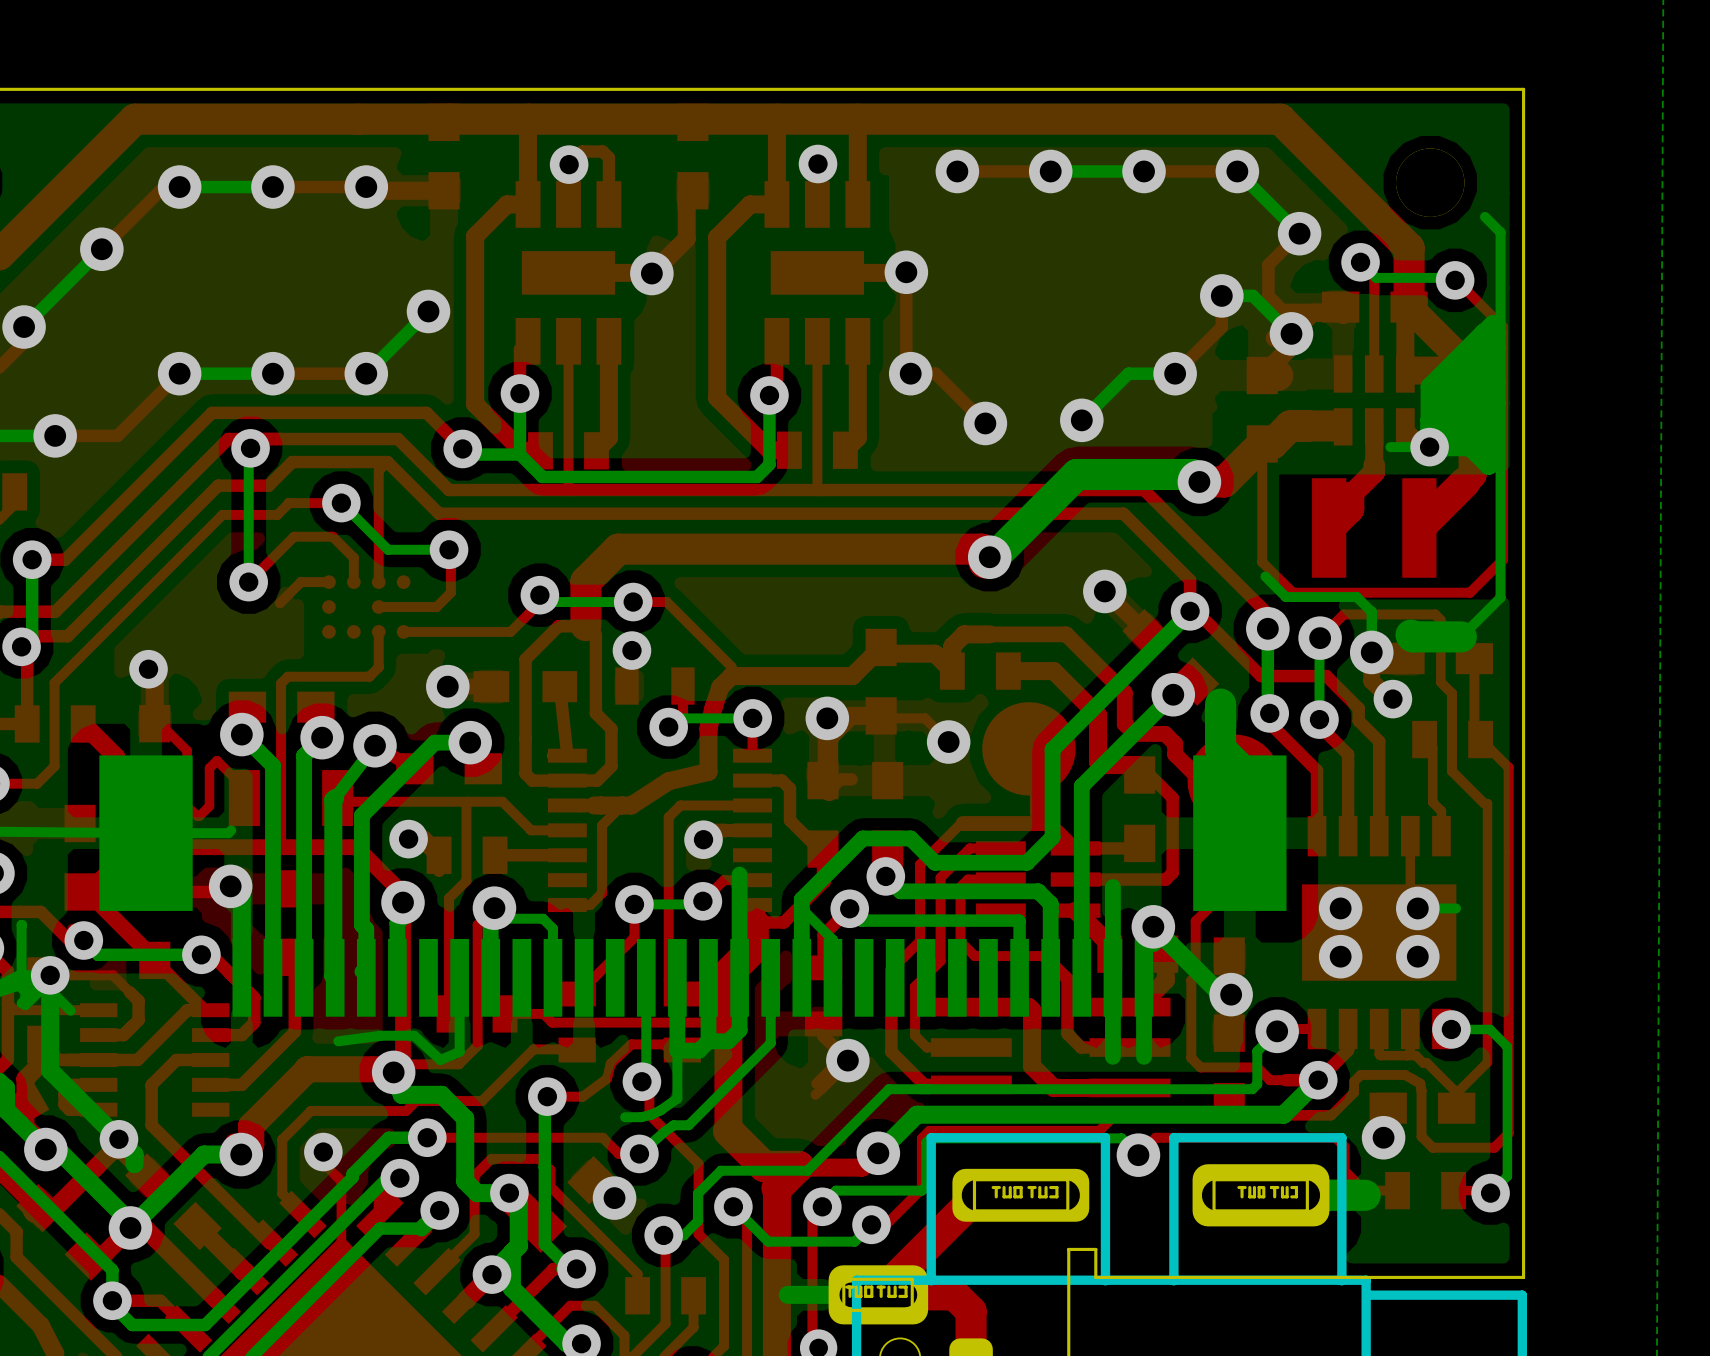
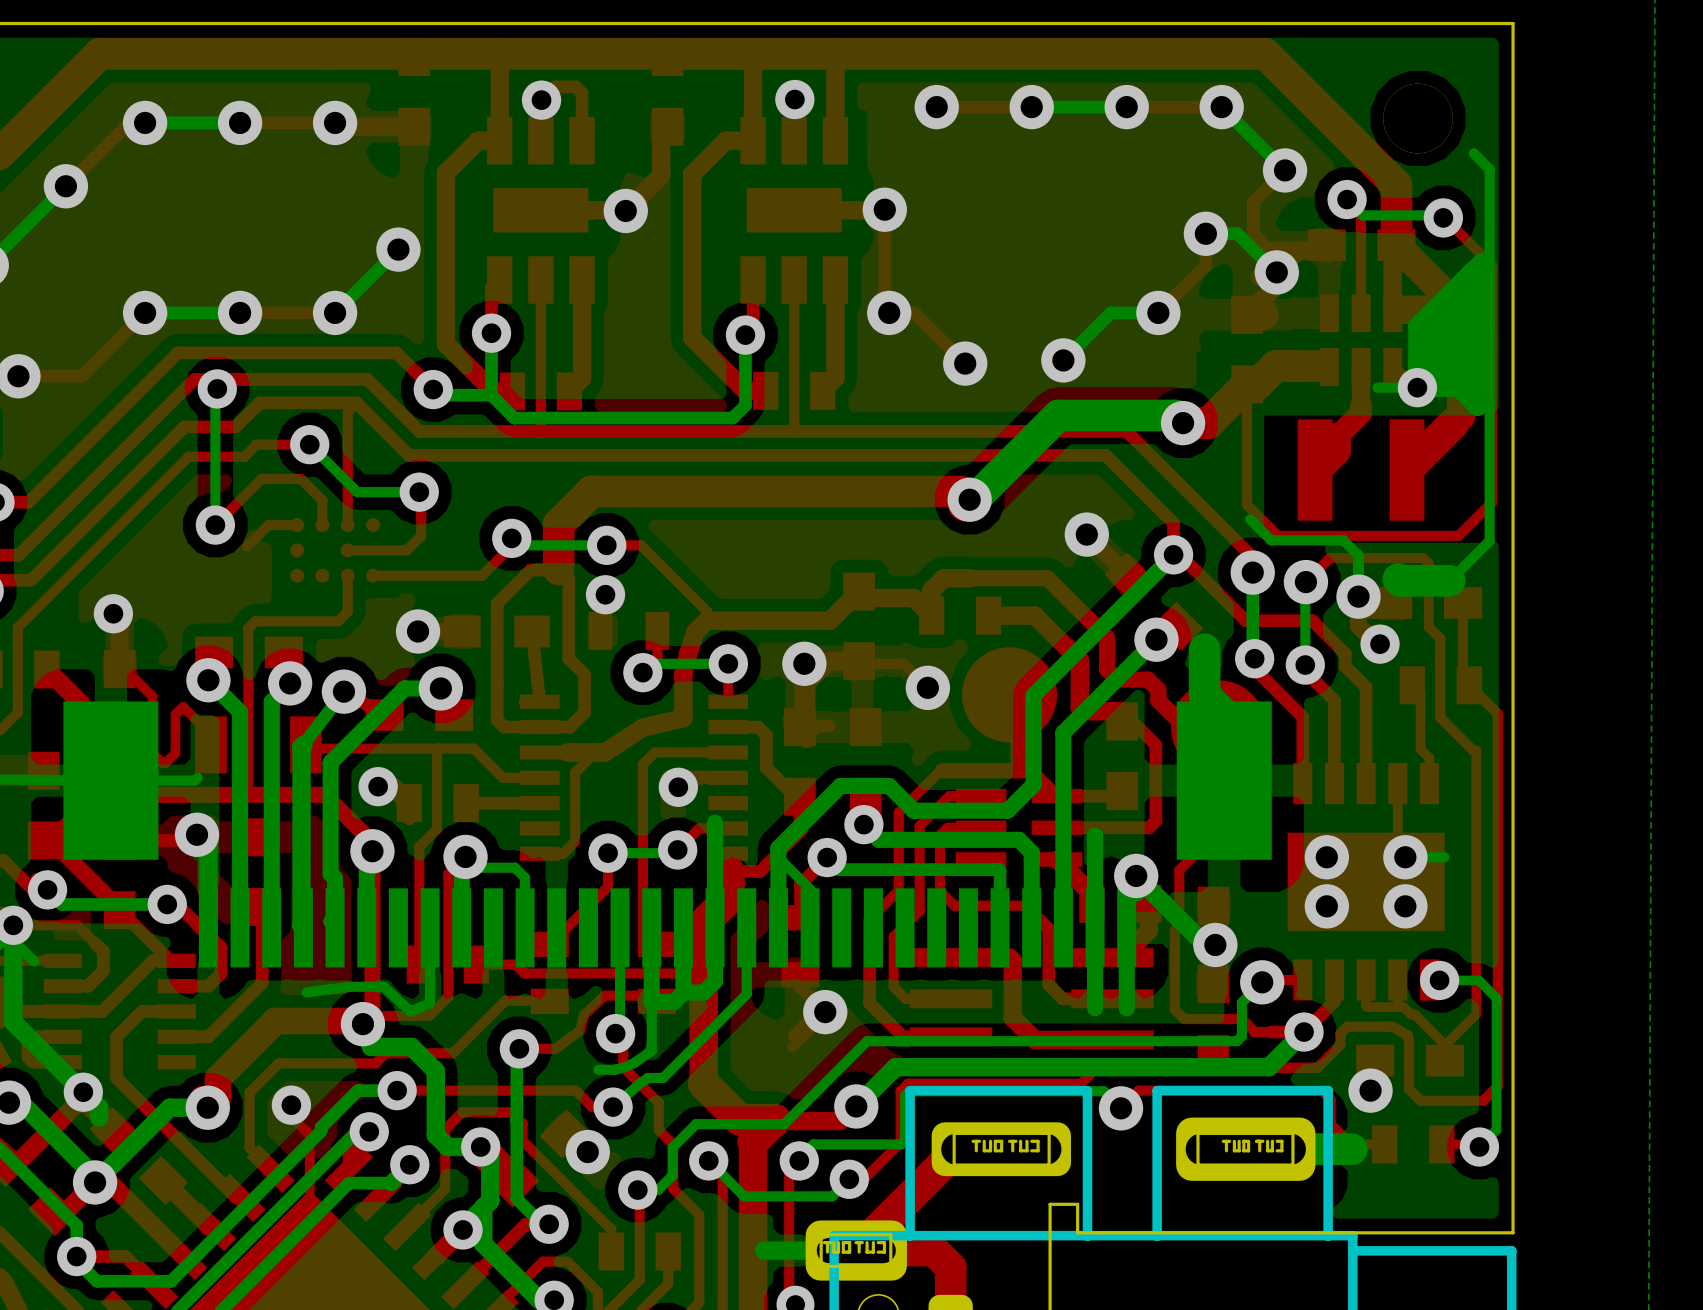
top track: (684, 1149) (698, 1163) (698, 1190) -> (658, 1102) (658, 1129) (673, 1144)

